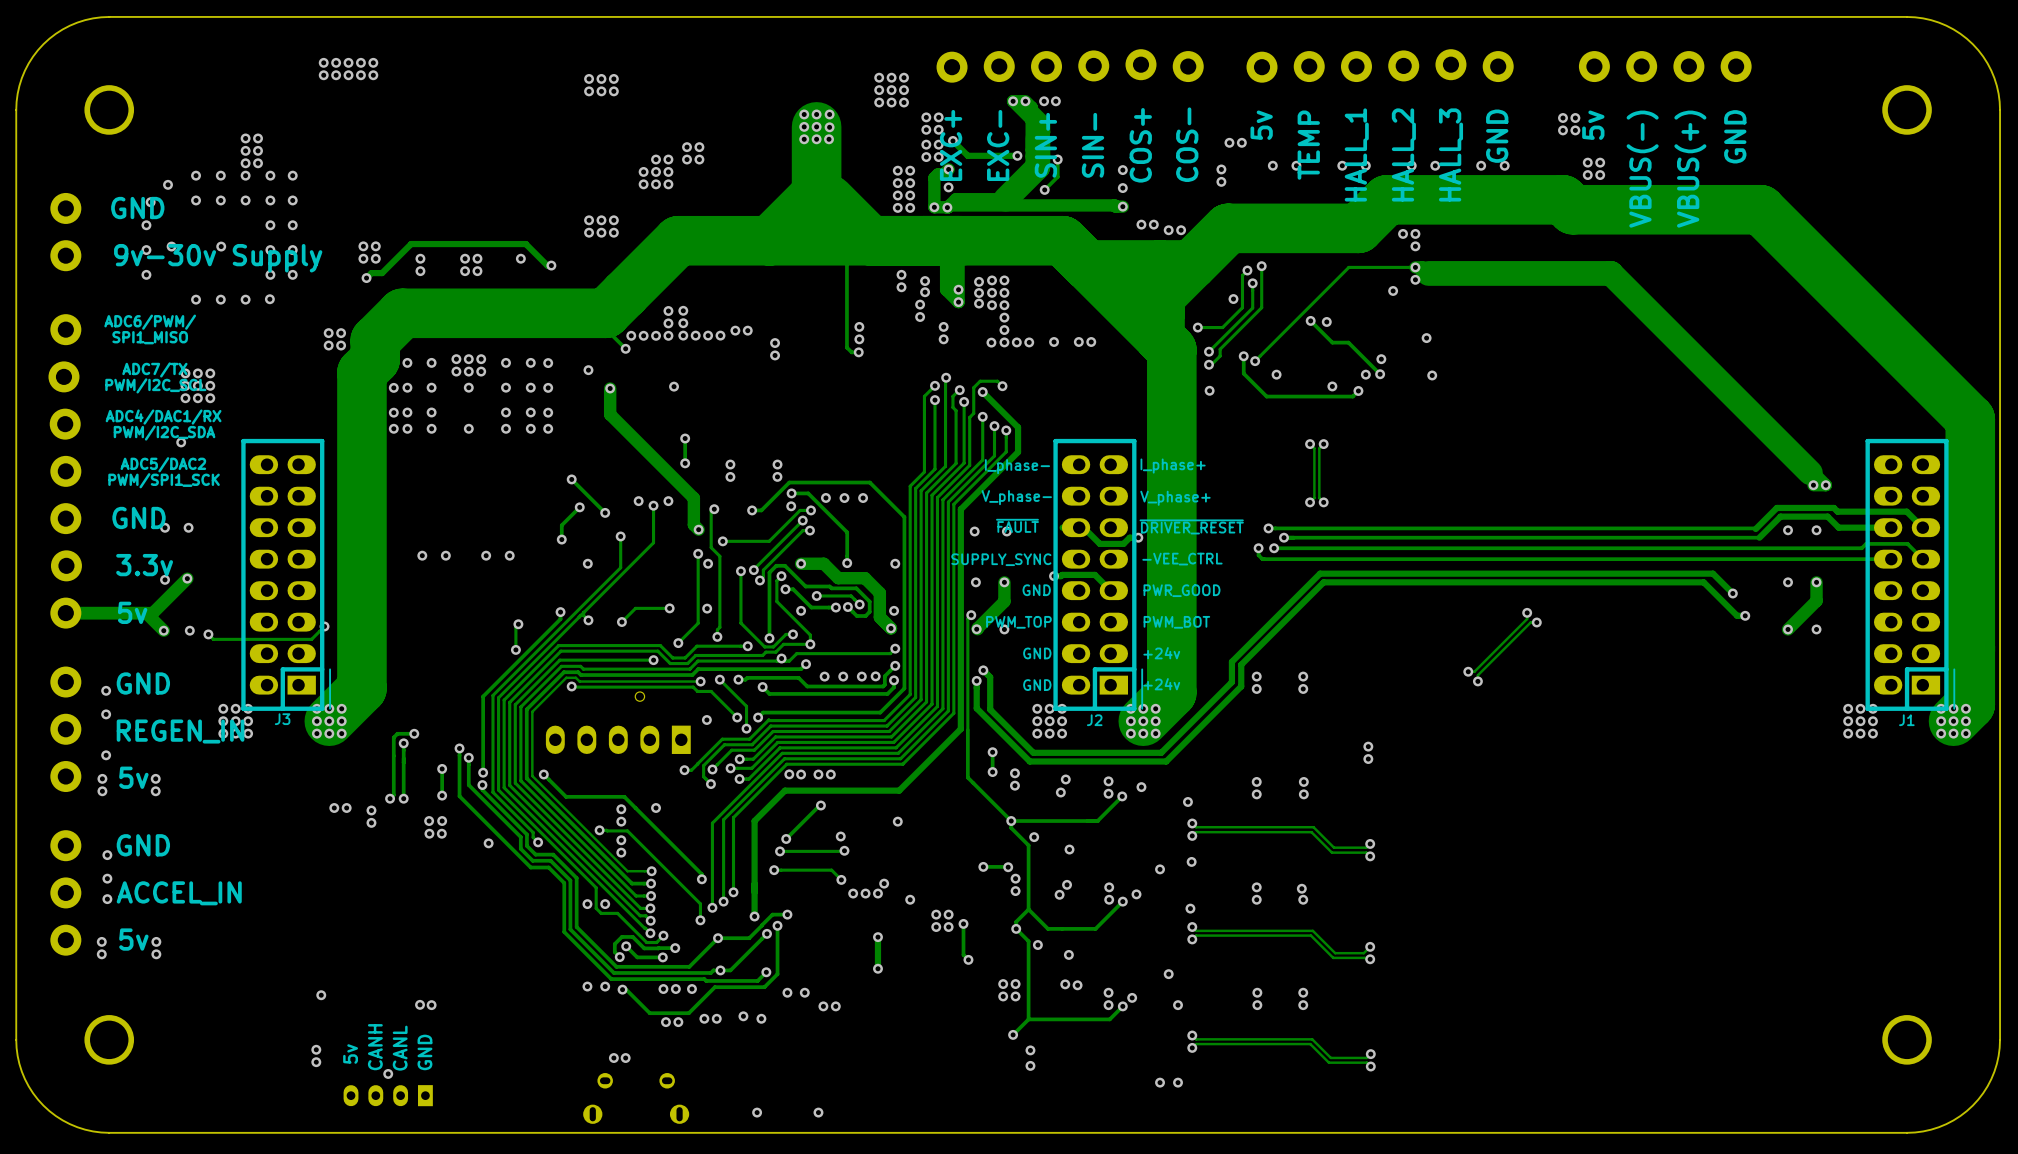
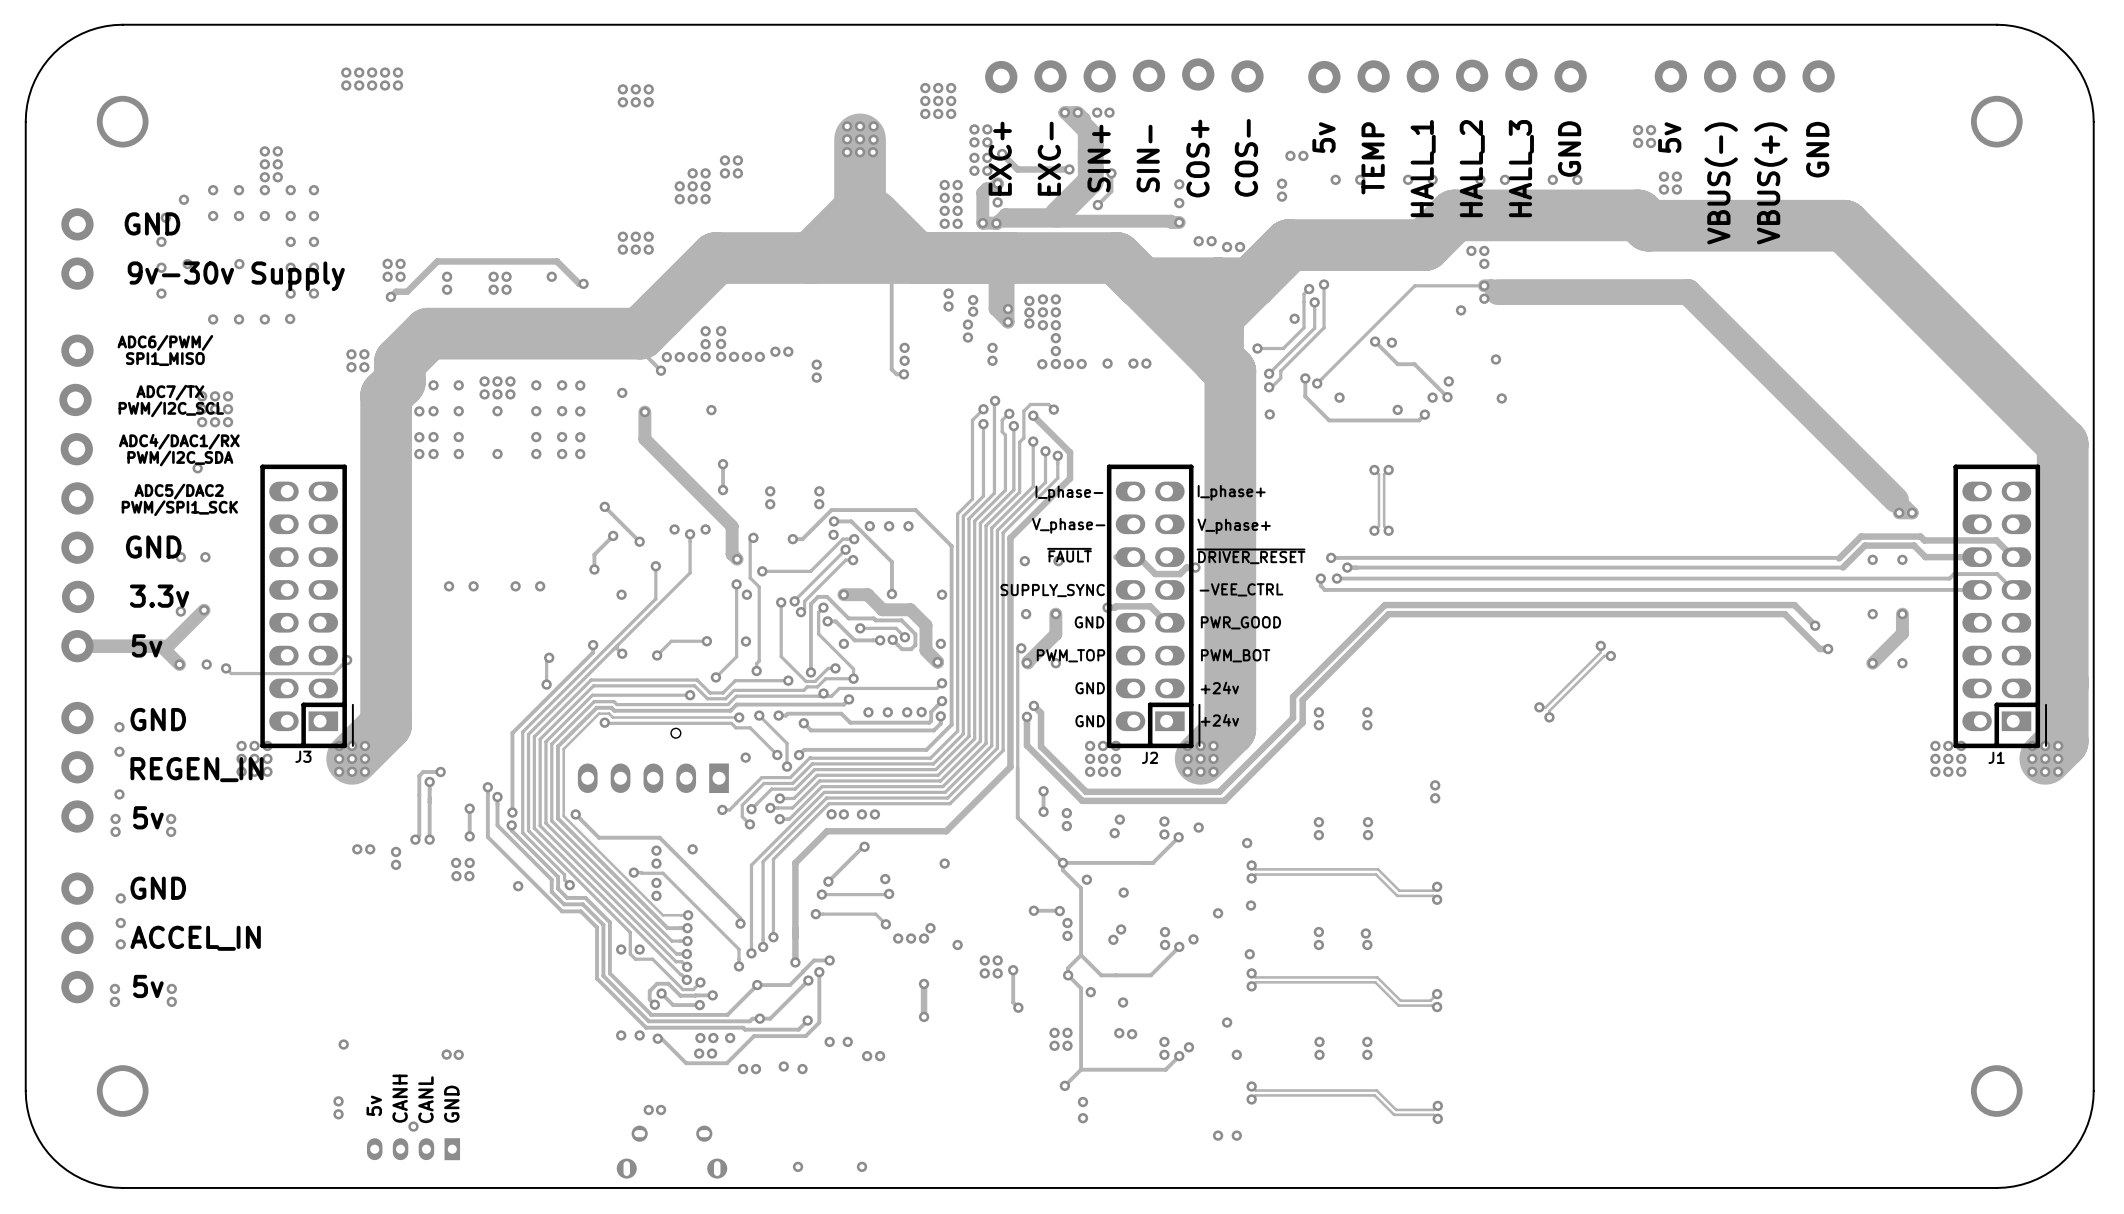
via: none -> (699, 1053)
via: none -> (712, 1053)
via: (665, 1022) -> none
via: (678, 1022) -> none

